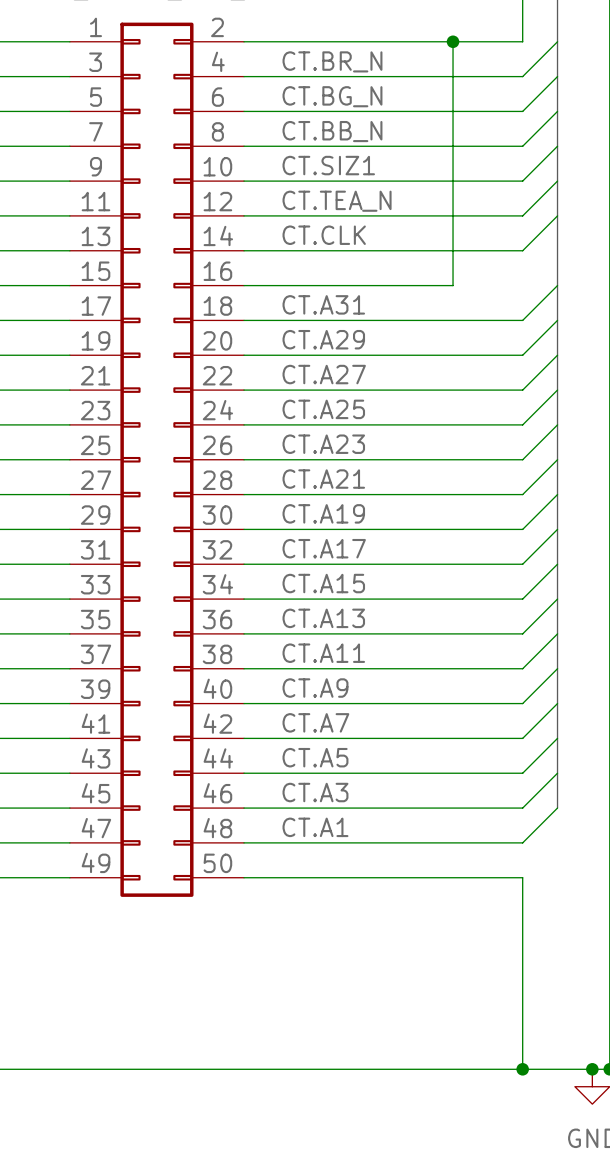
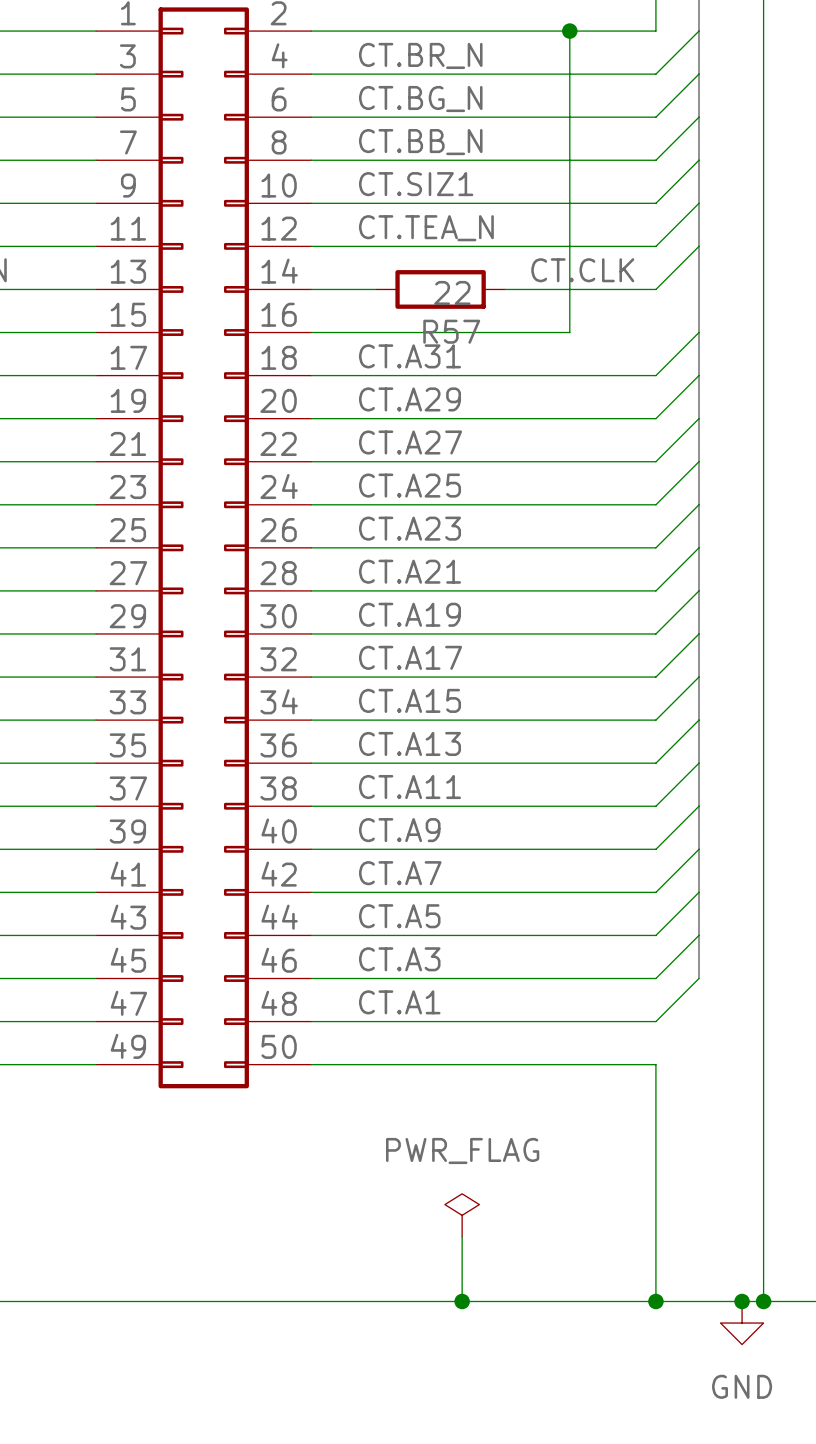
label position: CT.CLK (324, 235) -> CT.CLK (582, 270)
wire: (296, 250) (400, 250) -> none
R57: none -> 22 (440, 289)
power symbol: none -> PWR_FLAG (462, 1215)
wire: none -> (462, 1236) (462, 1301)
junction: none -> (462, 1301)

